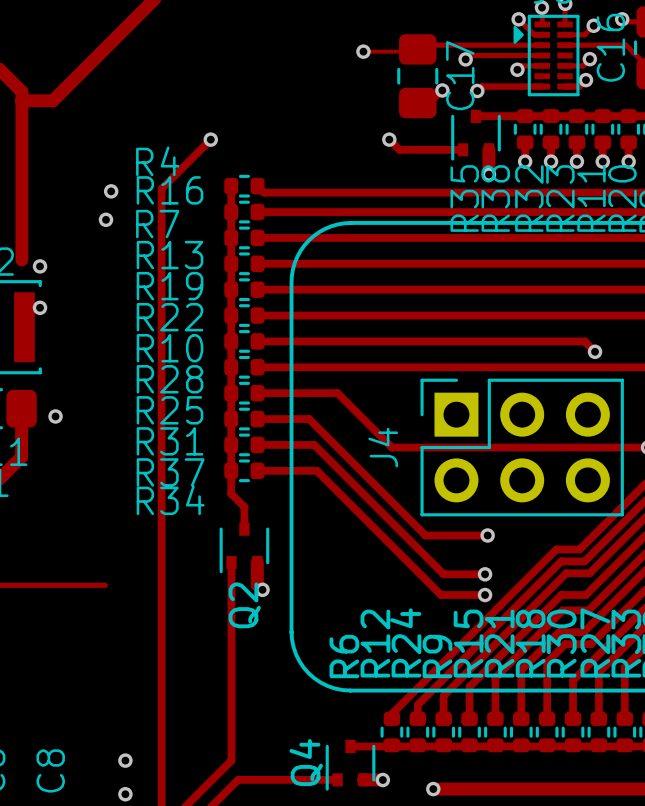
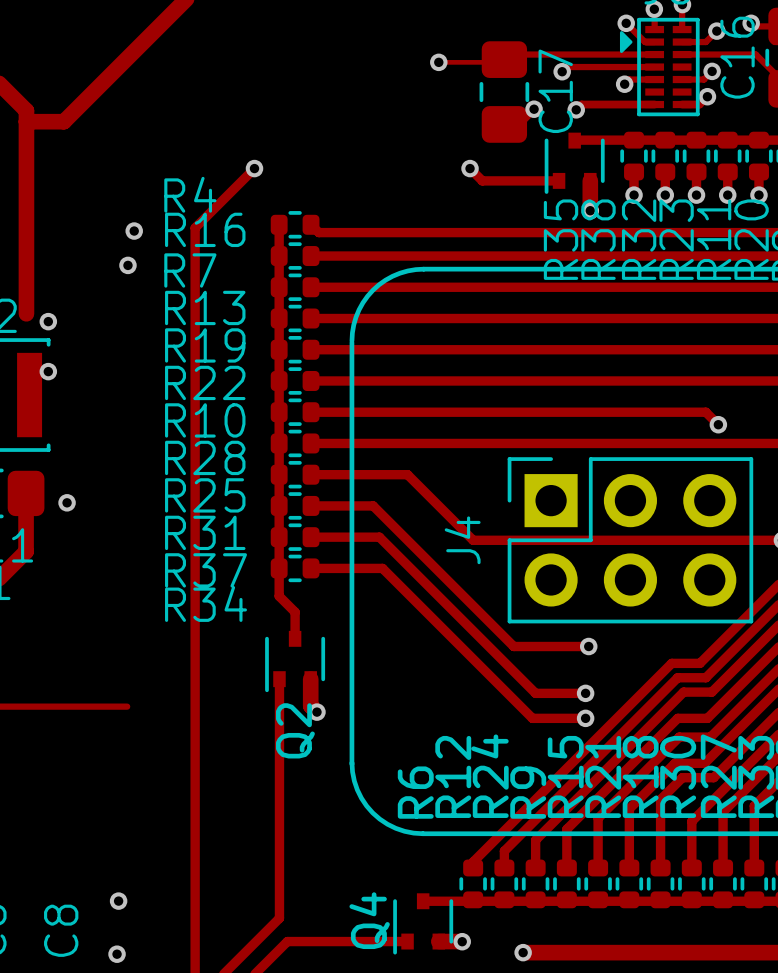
via: none -> (118, 901)
via: (125, 760) -> none
via: none -> (117, 954)
via: (125, 794) -> none

